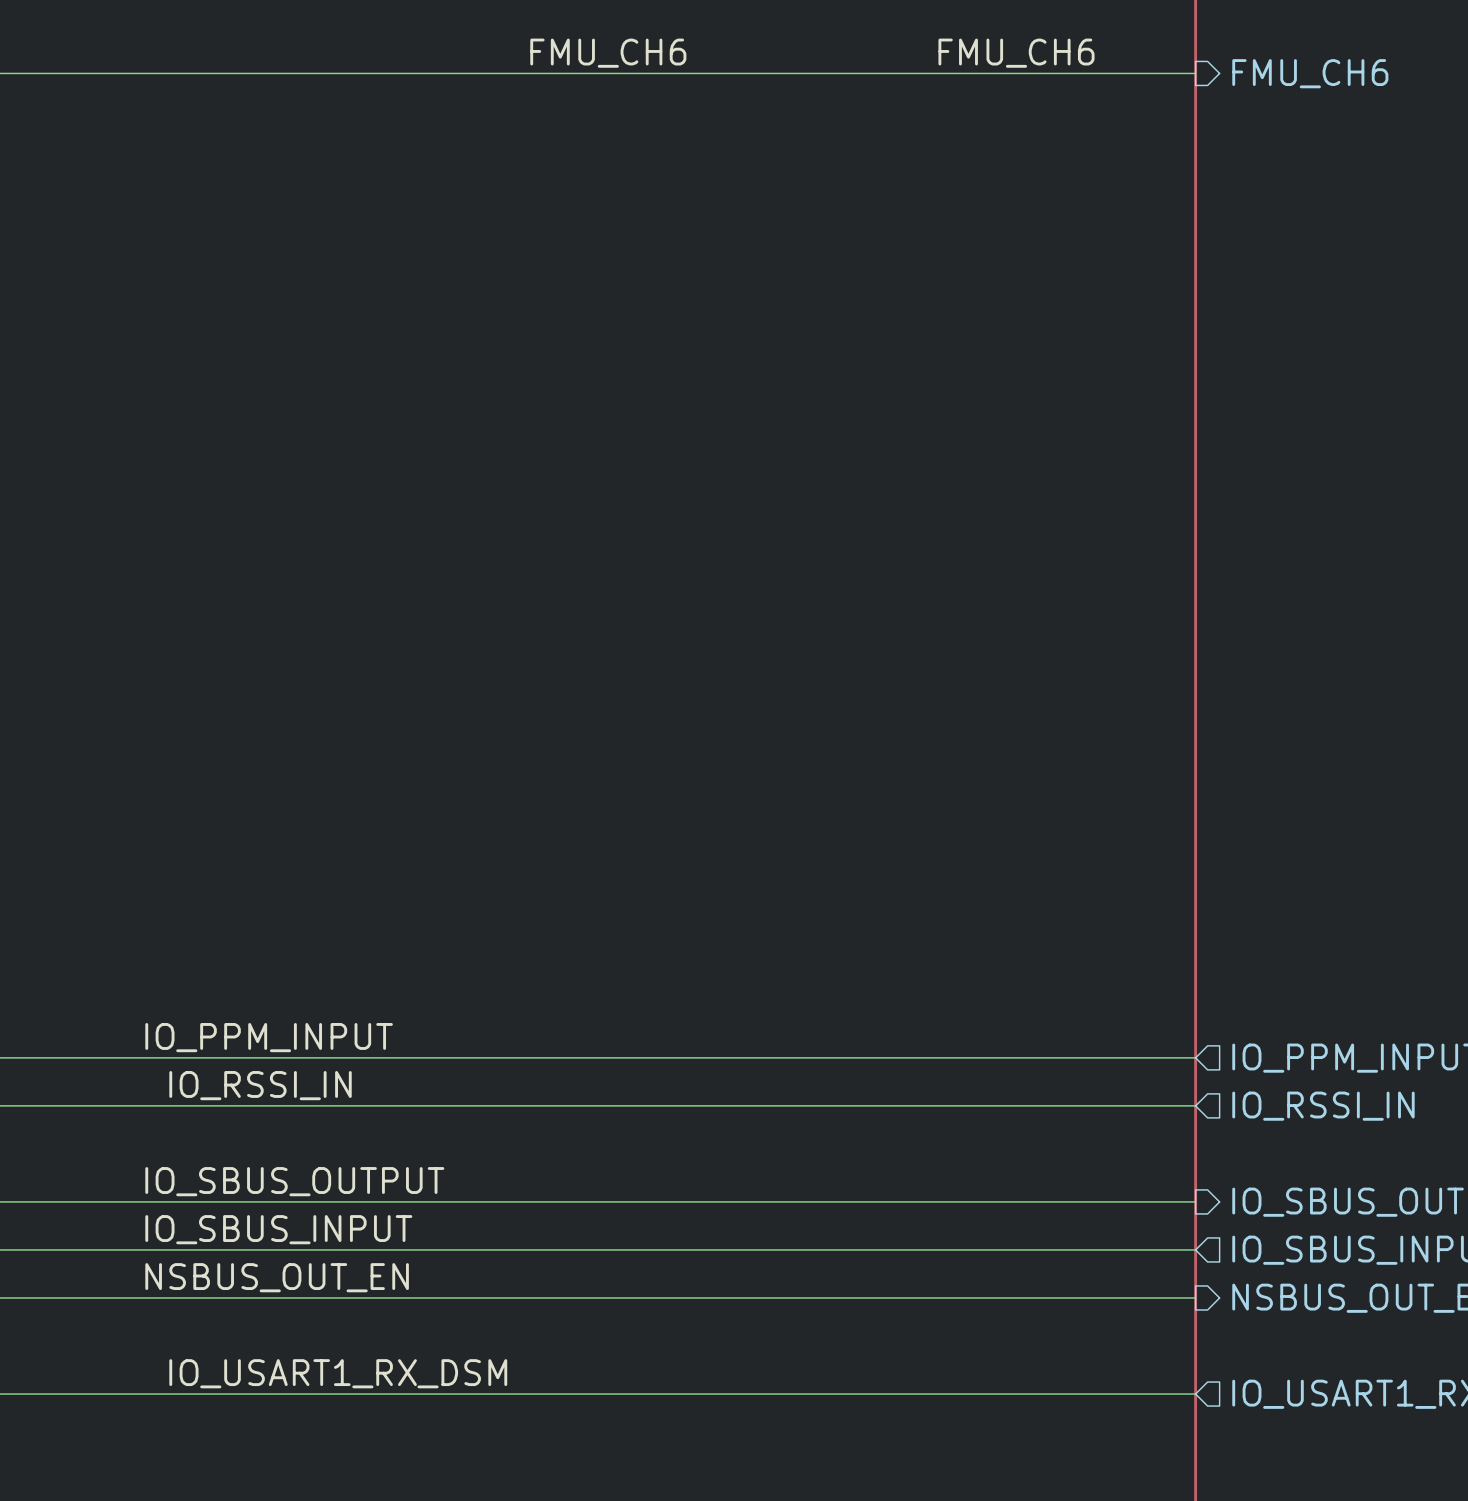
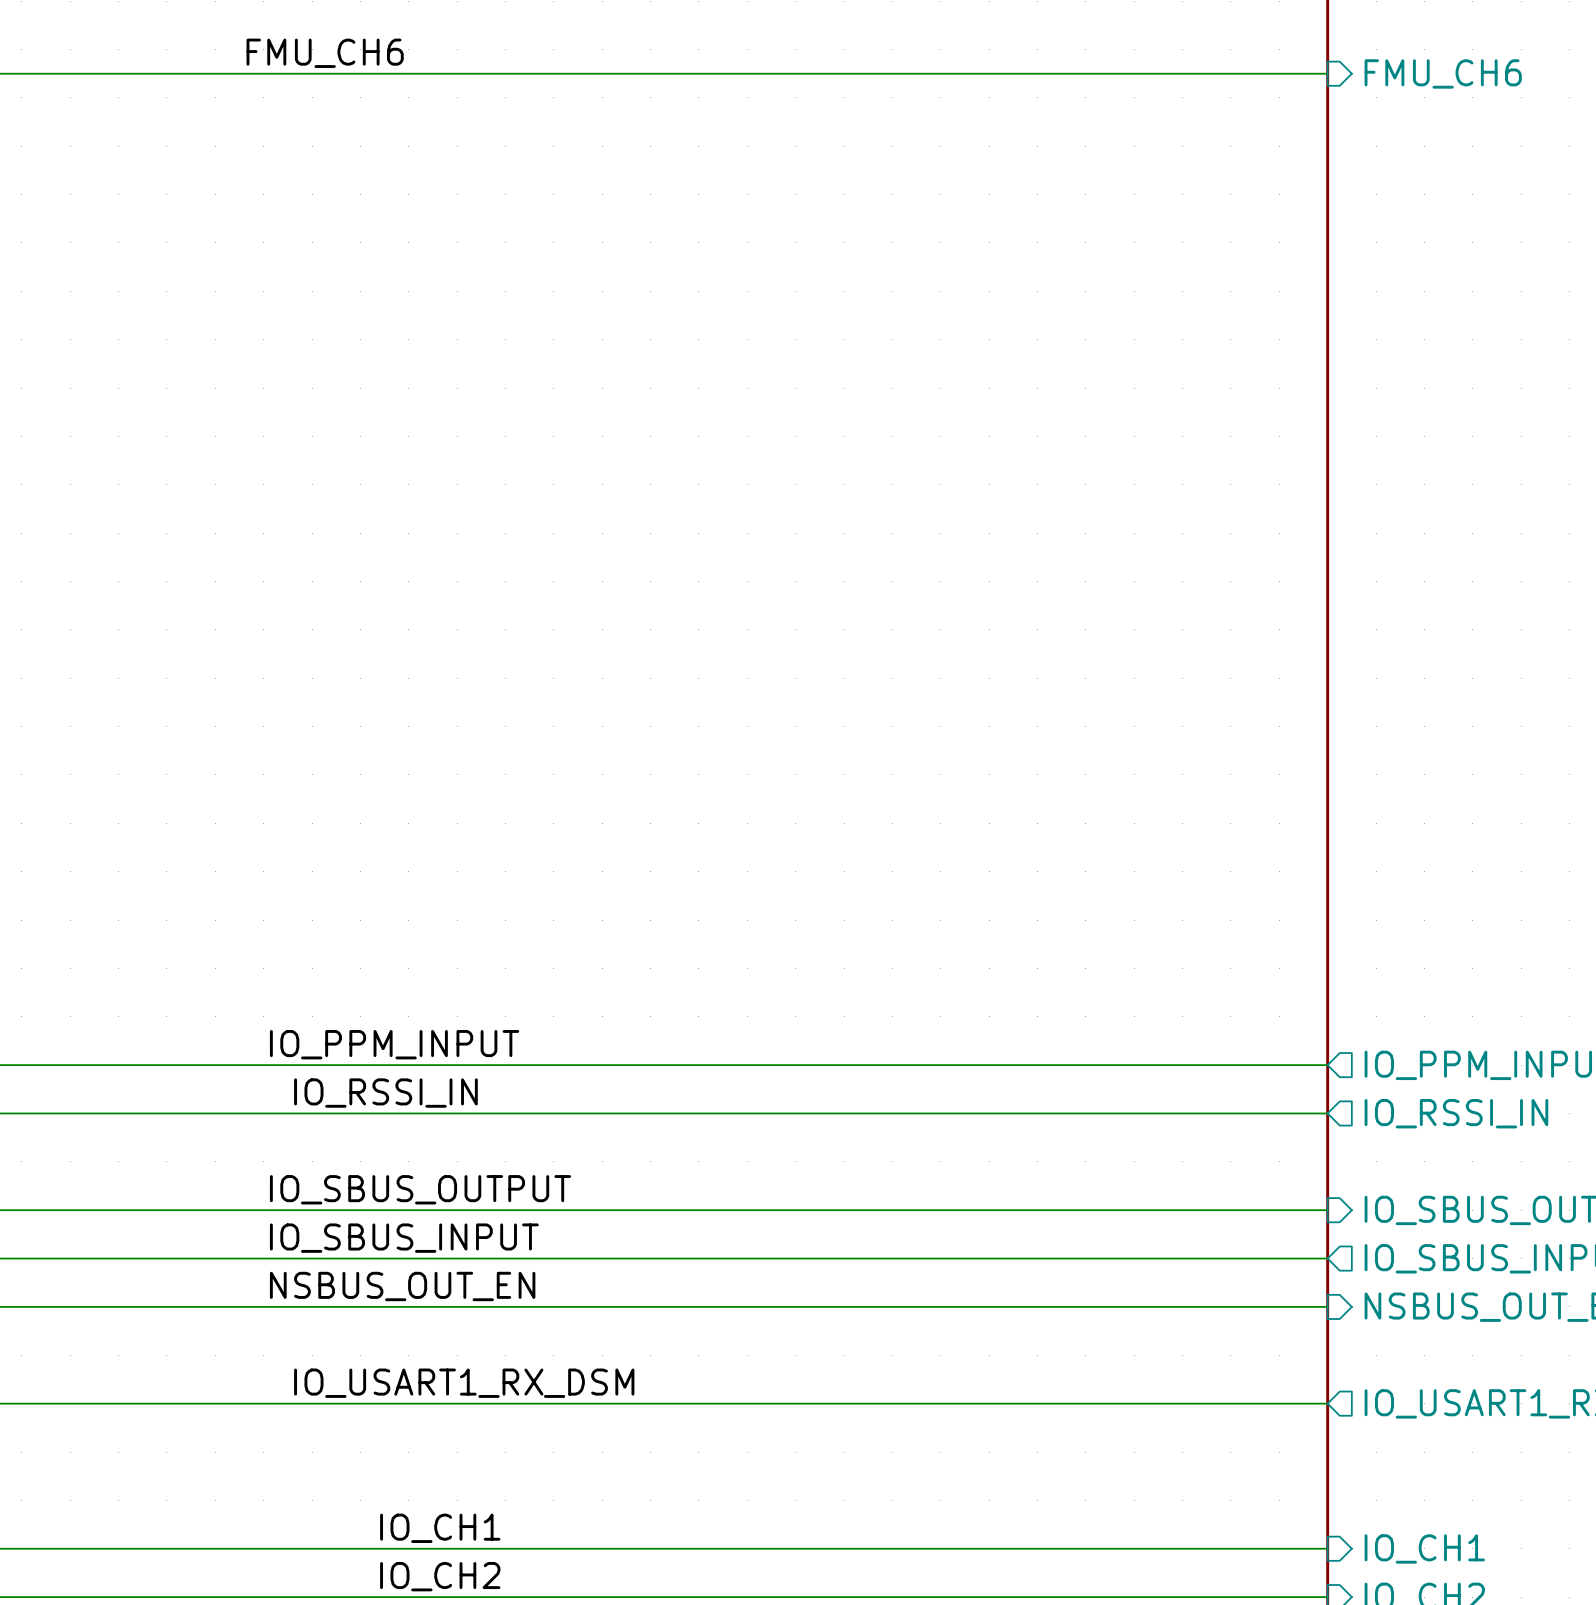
label: none -> FMU_CH6 (325, 53)
label: FMU_CH6 (608, 53) -> none
label: FMU_CH6 (1016, 53) -> none

